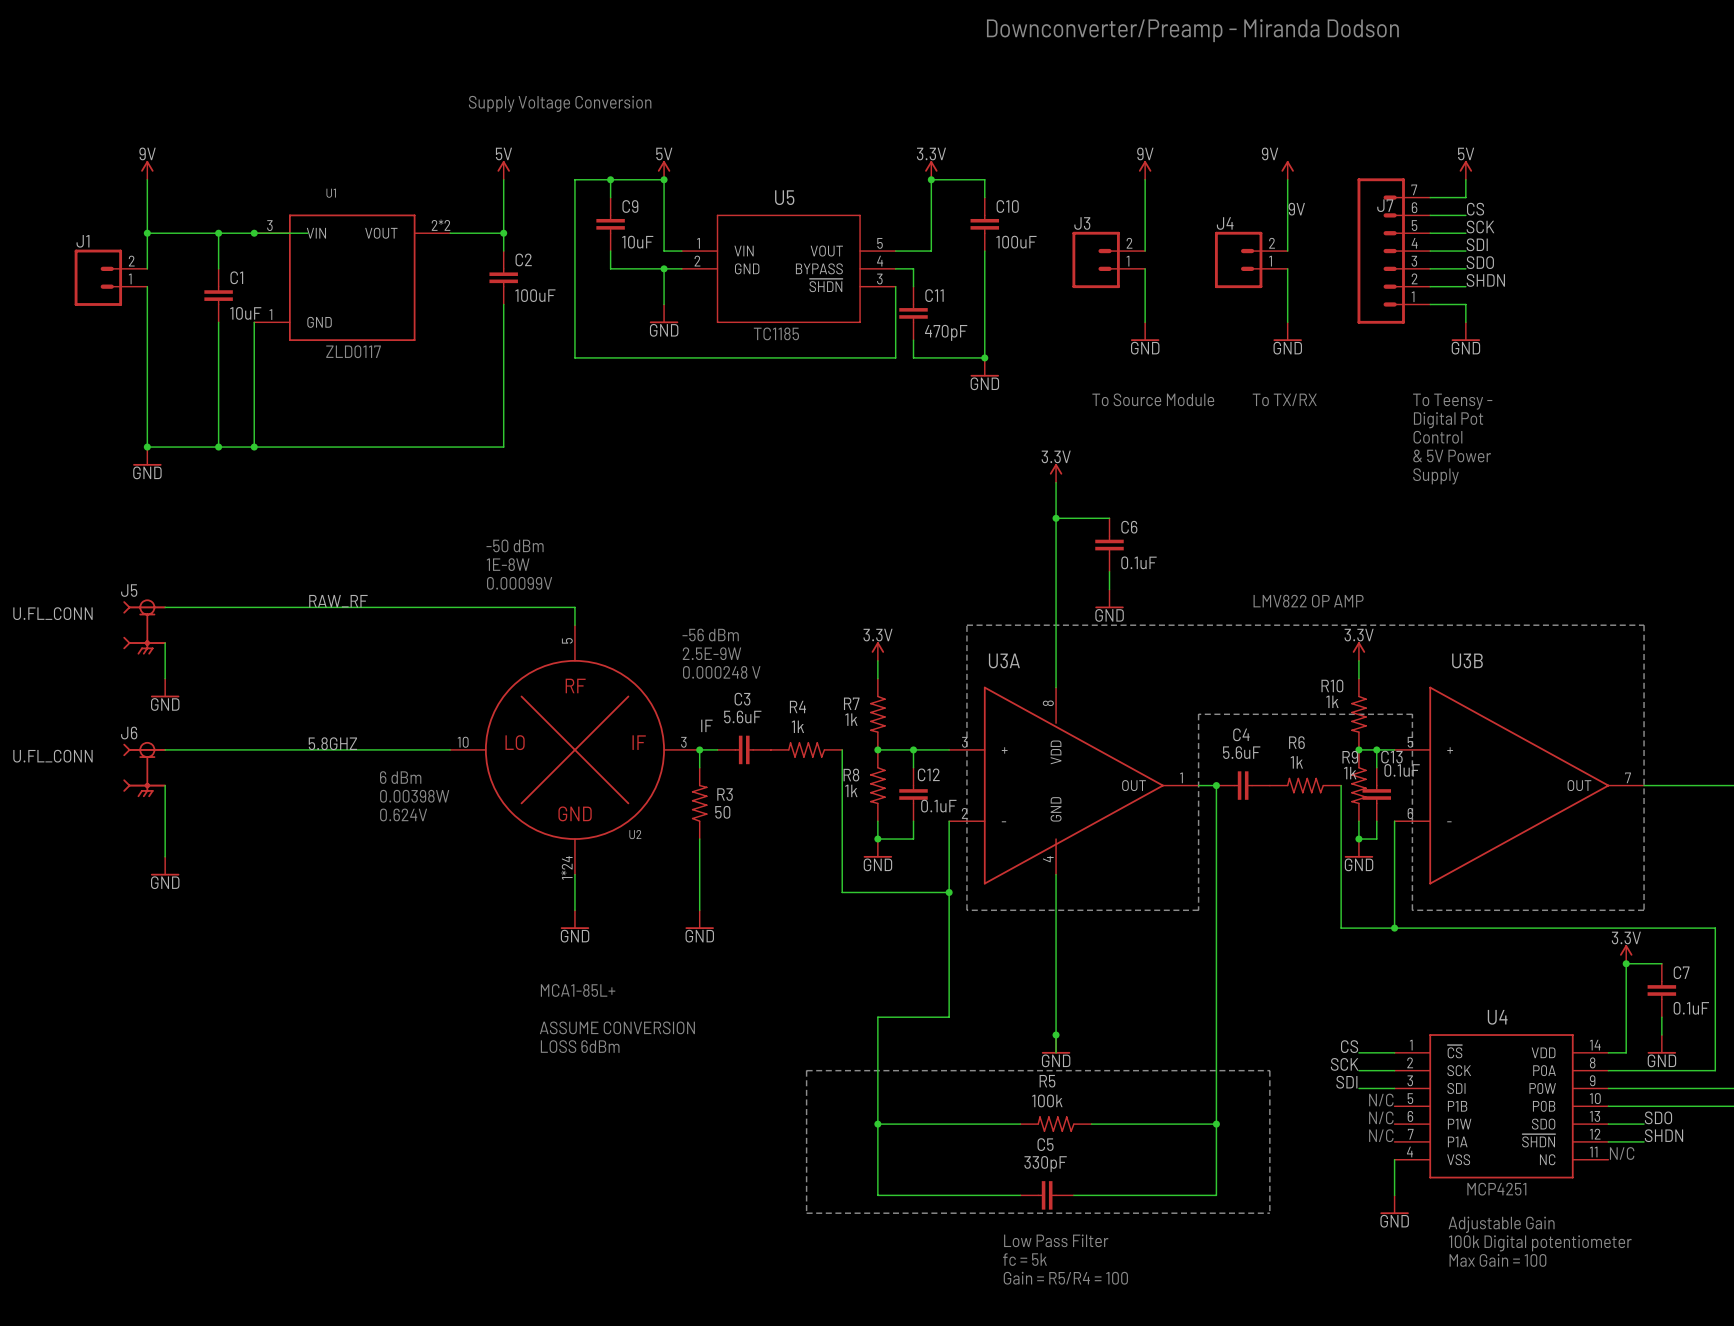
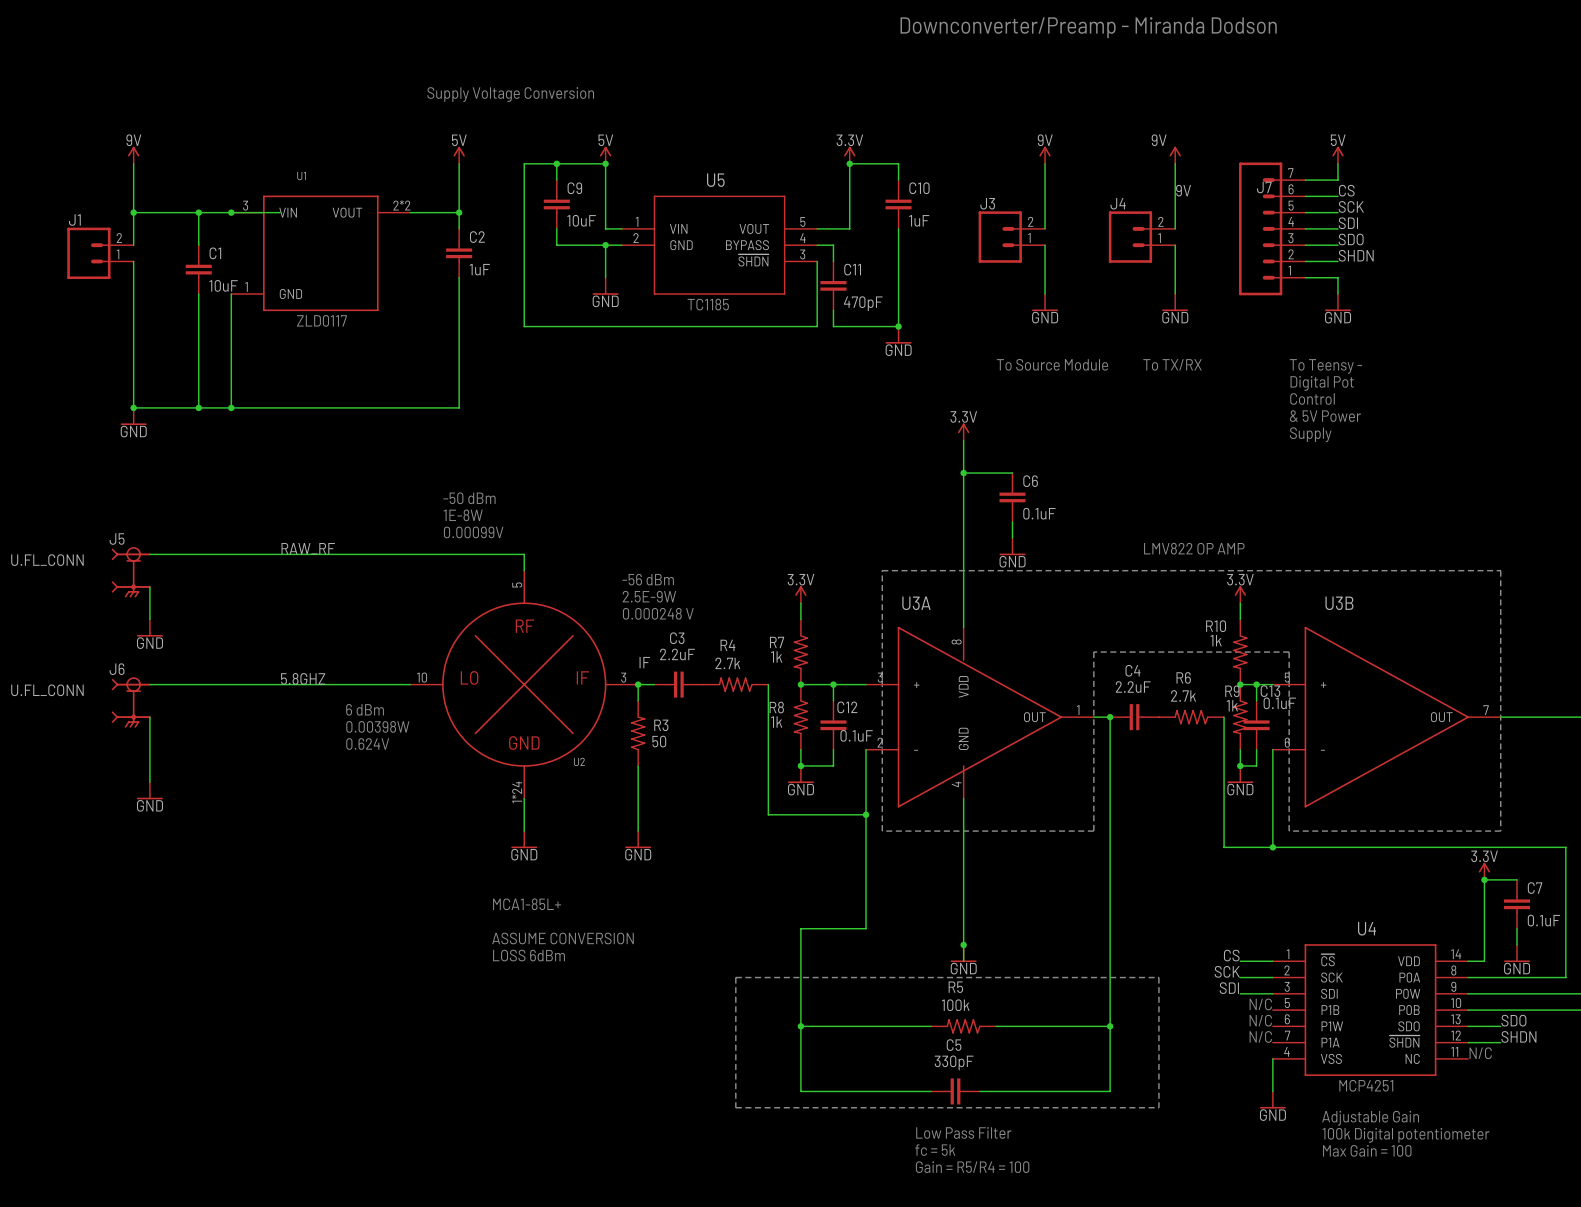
C10 value: 100uF (1016, 242) -> 1uF (919, 220)
C2 value: 100uF (535, 295) -> 1uF (479, 269)
C3 value: 5.6uF (742, 716) -> 2.2uF (677, 654)
R4 value: 1k (797, 726) -> 2.7k (727, 663)
C4 value: 5.6uF (1241, 752) -> 2.2uF (1133, 687)
R6 value: 1k (1296, 762) -> 2.7k (1183, 695)

